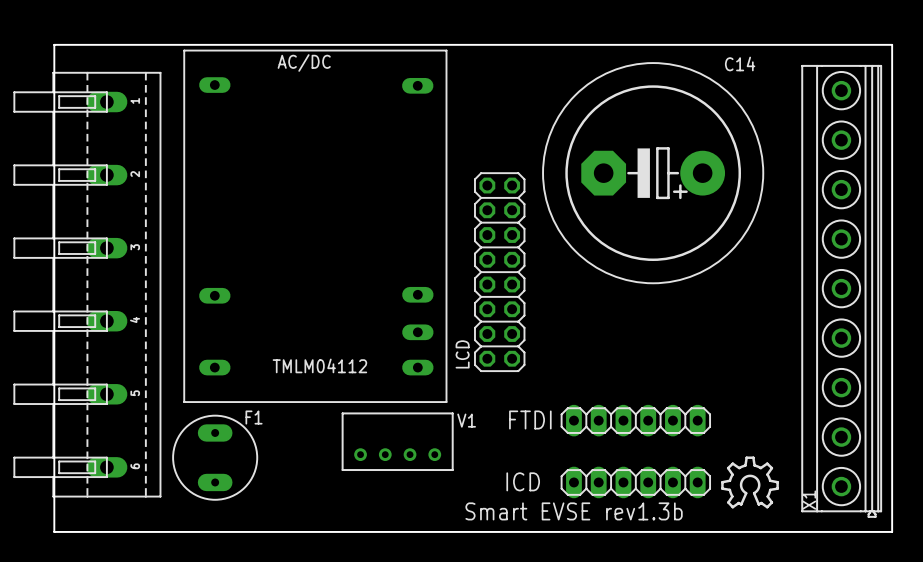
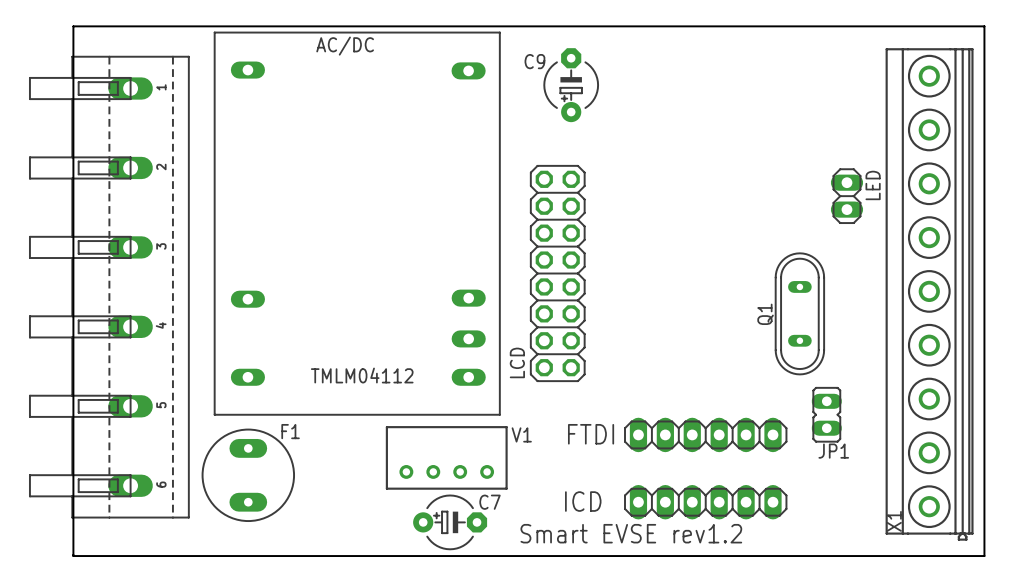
C9: none -> (571, 85)
C14: (653, 173) -> none
LED: none -> (846, 196)
Q1: none -> (799, 313)
JP1: none -> (826, 414)
drawing: [721, 456, 779, 509] -> none
C7: none -> (450, 522)
text: Smart EVSE rev1.3b (574, 511) -> Smart EVSE rev1.2 (631, 533)

